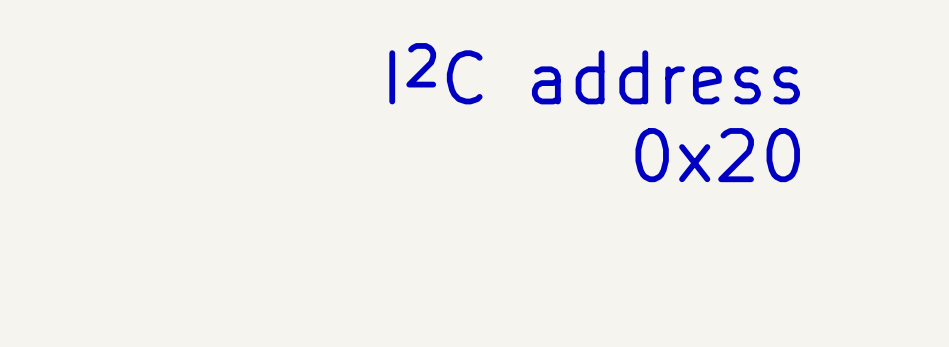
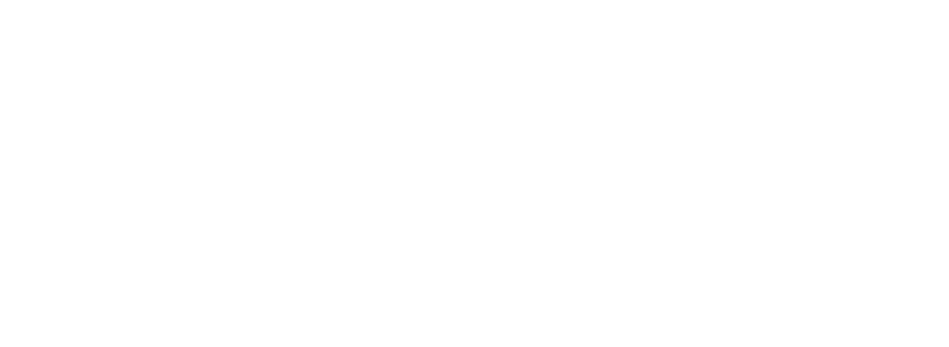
text: I2C address (594, 73) -> none
text: 0x20 (717, 155) -> none

